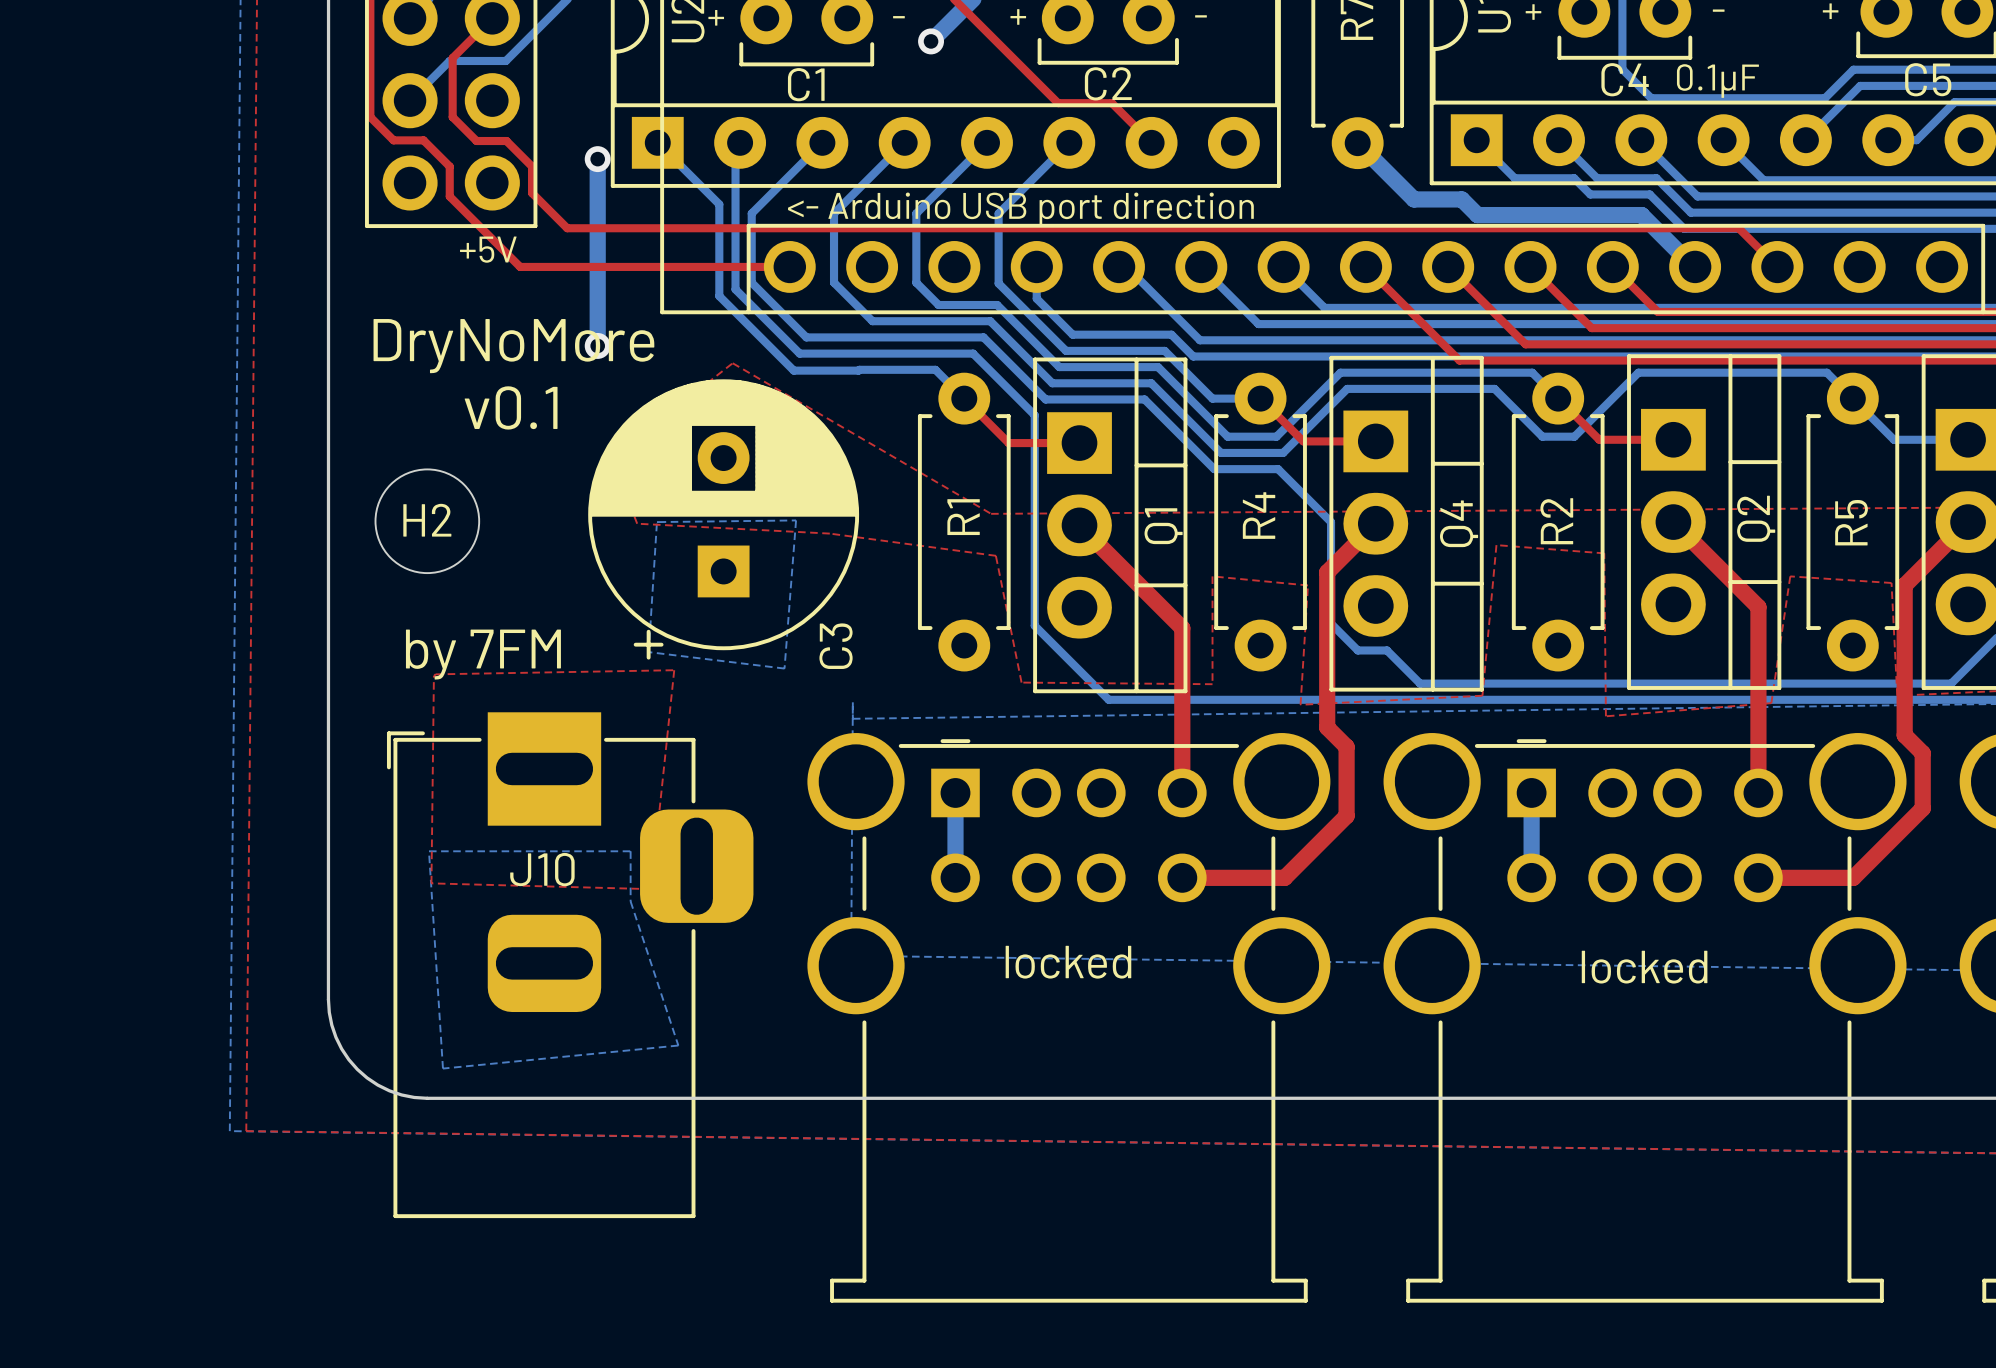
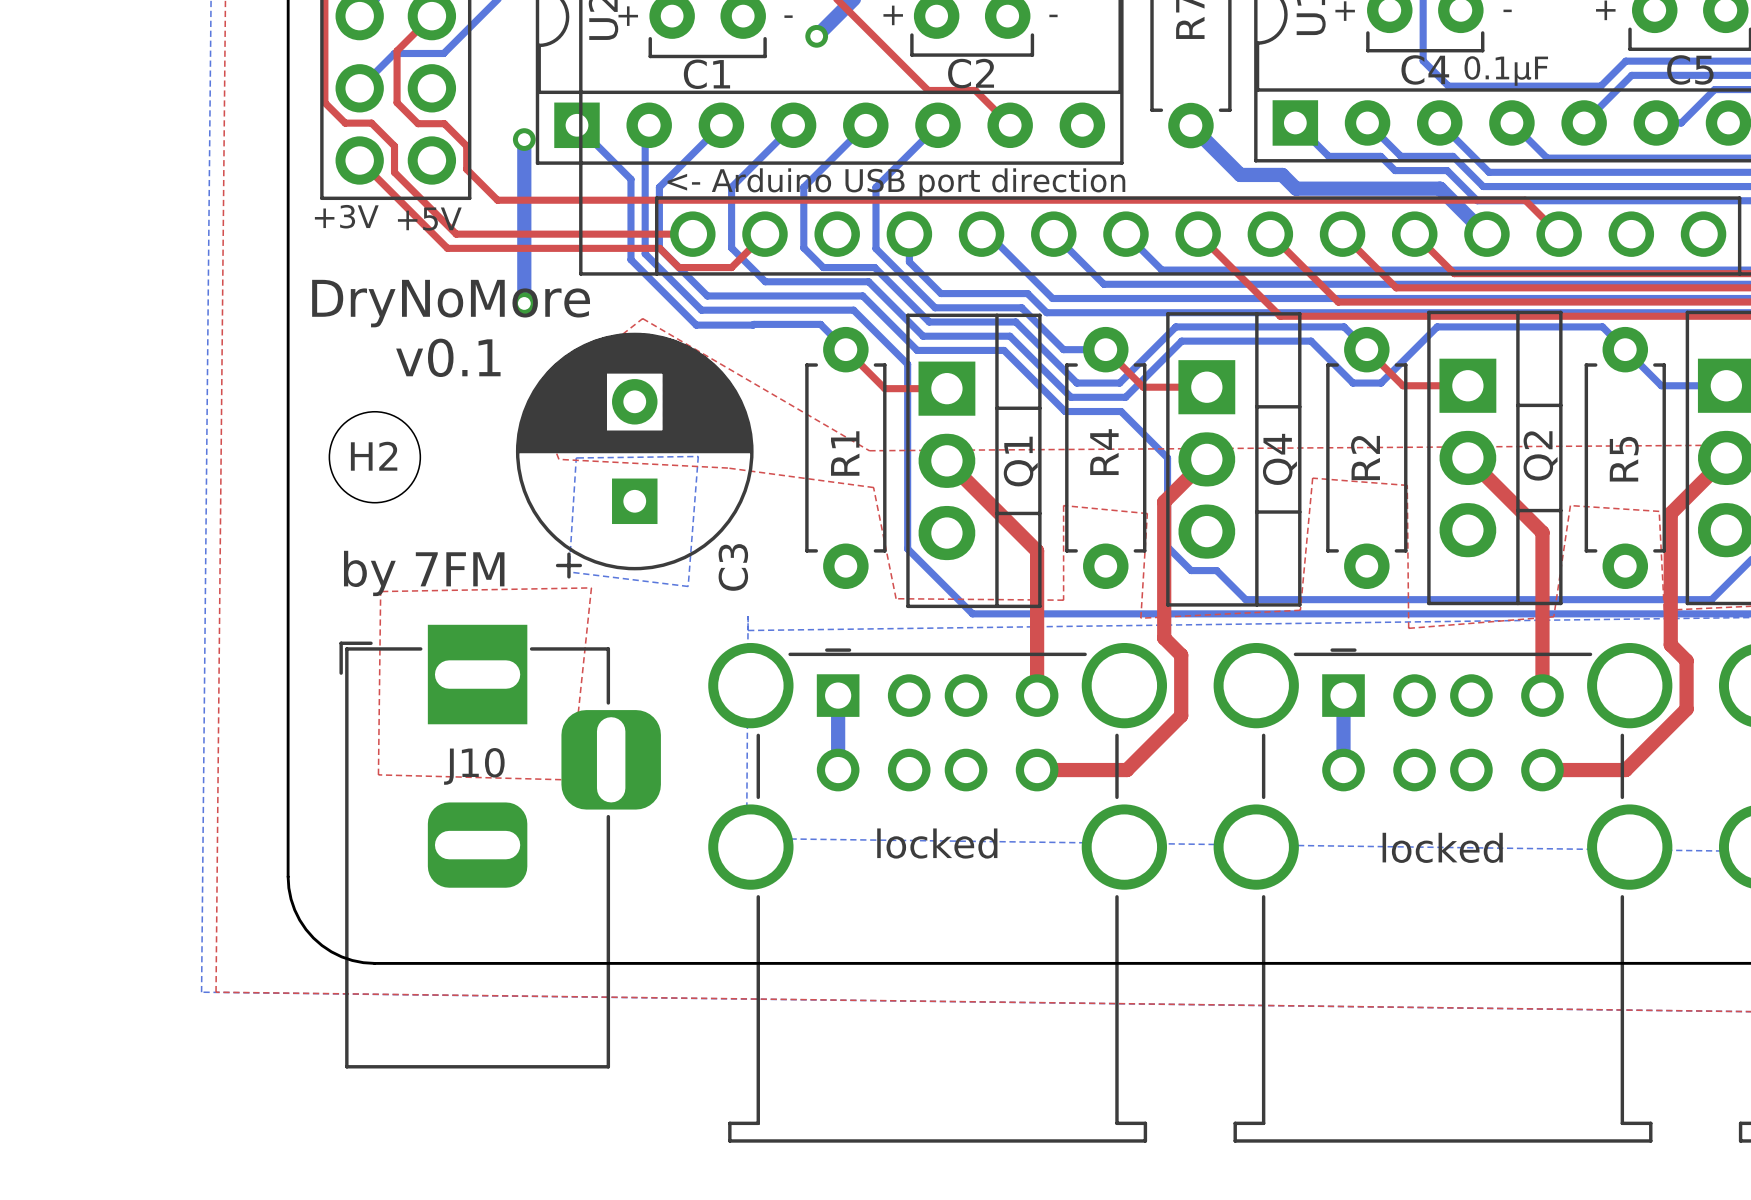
top track: none -> (359, 160) (447, 248) (659, 248) (678, 267) (731, 267) (764, 234)
text: none -> +3V (346, 216)
bottom zone outline: (428, 851) (442, 1068) (678, 1045) (630, 901) (630, 851) (428, 851) -> none

